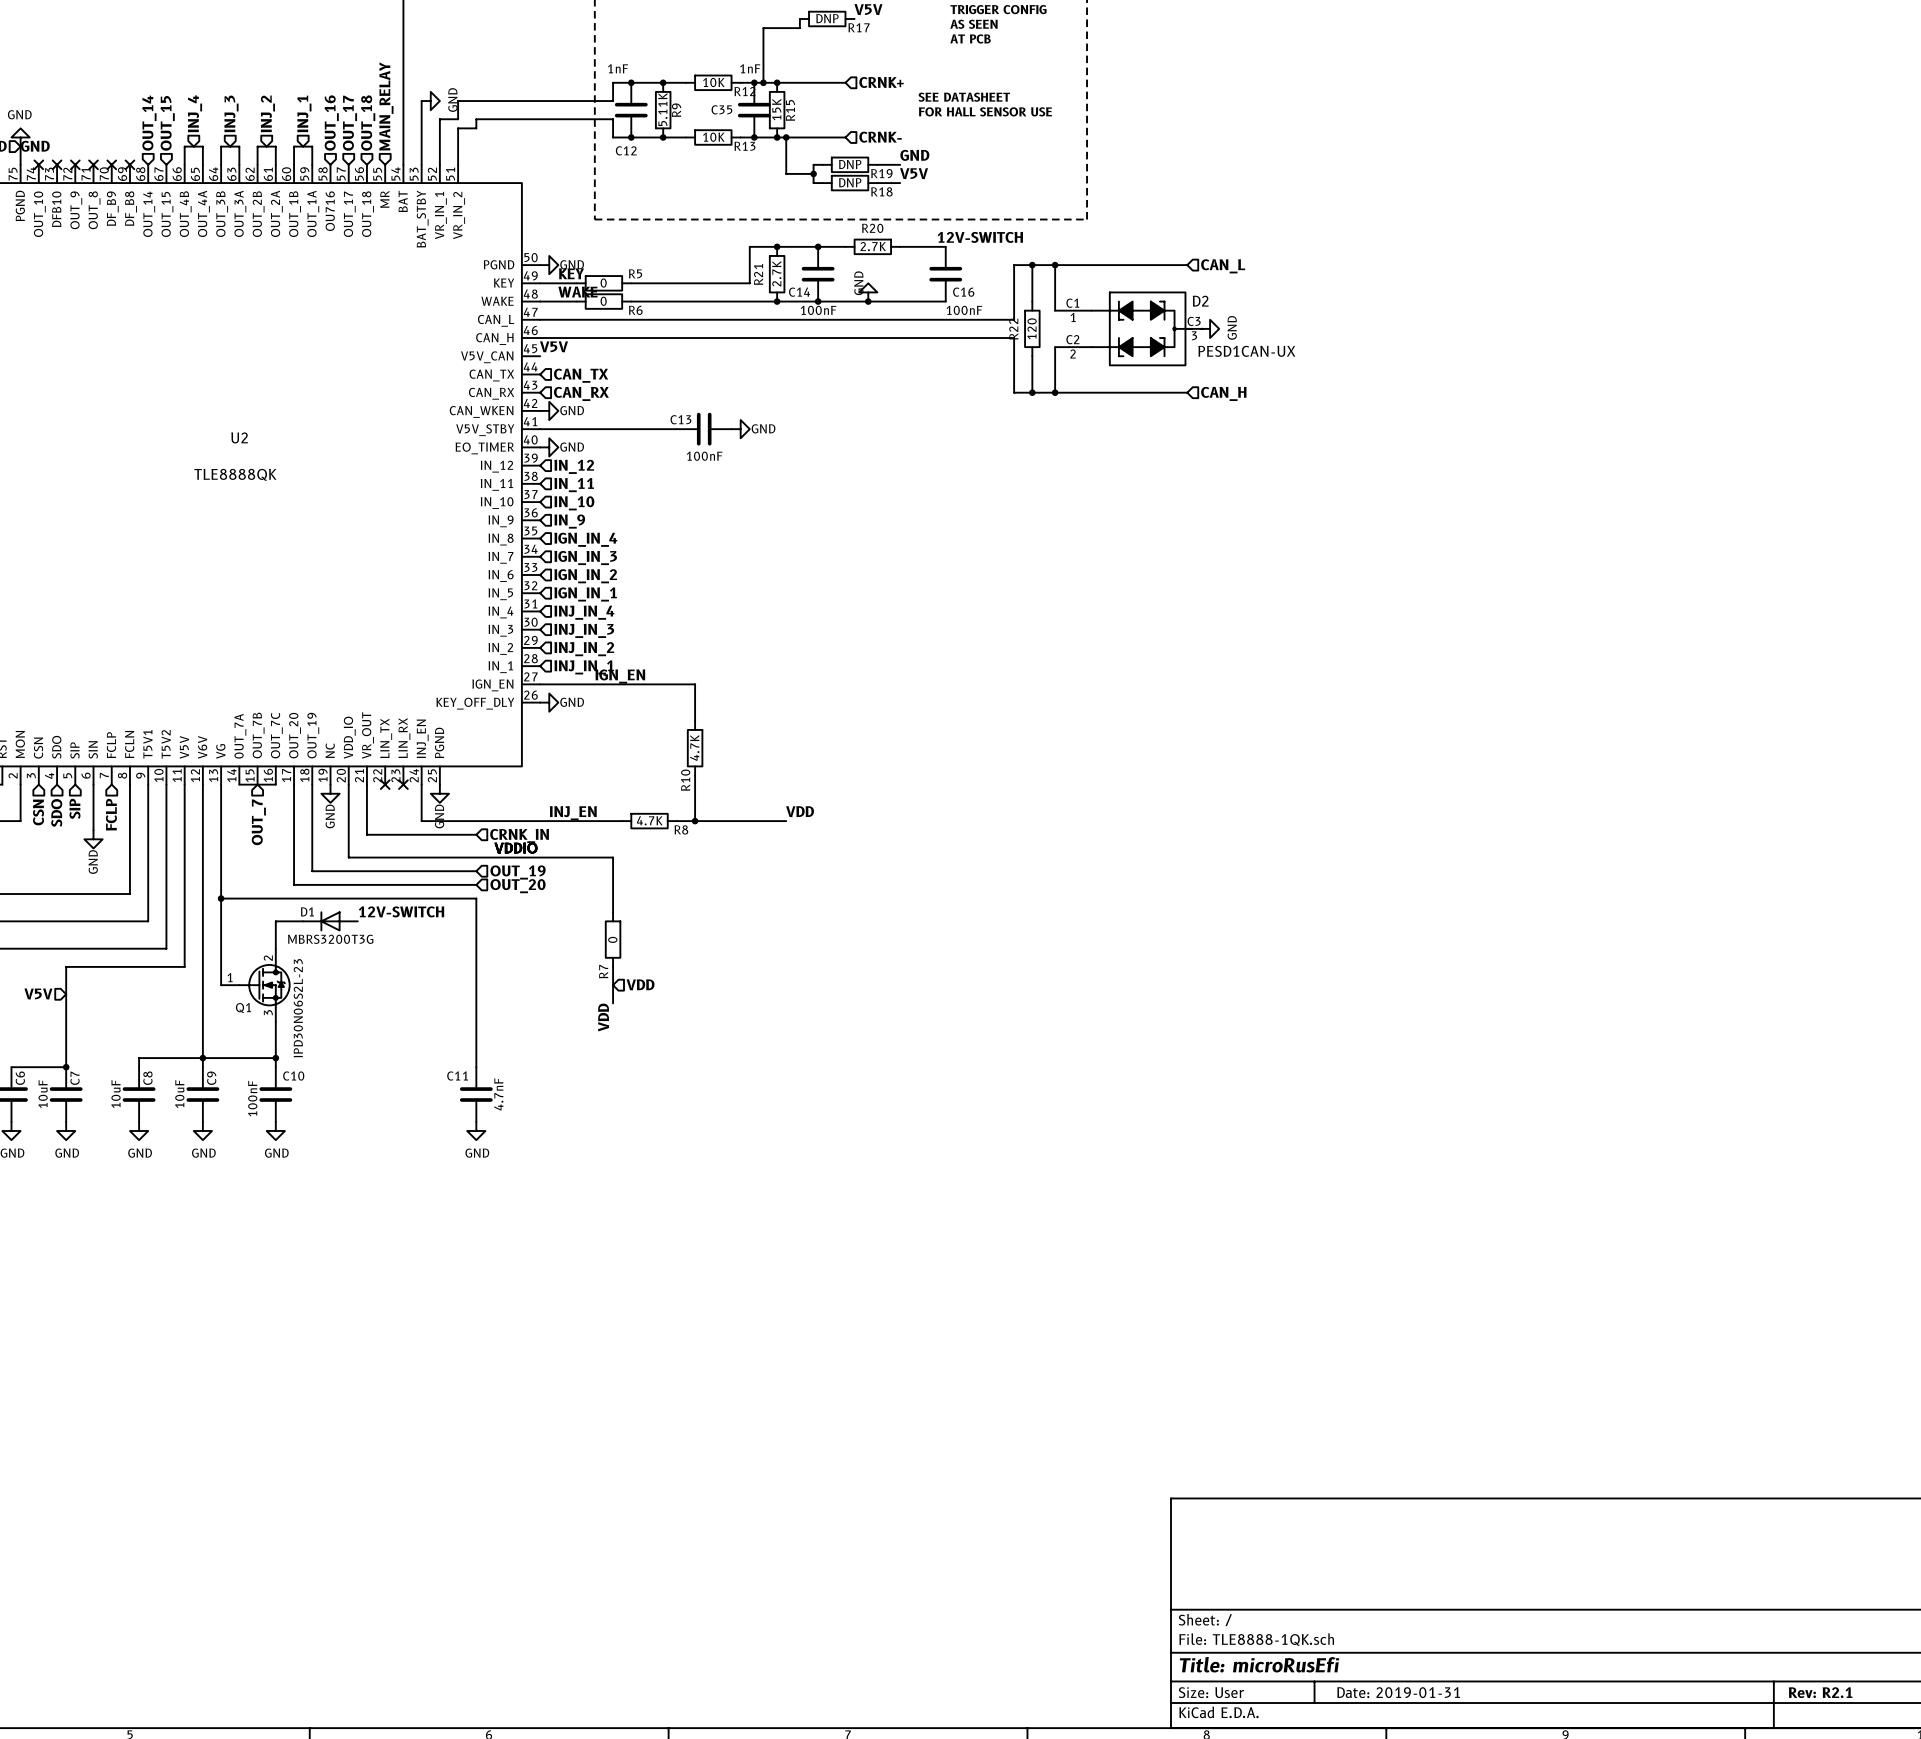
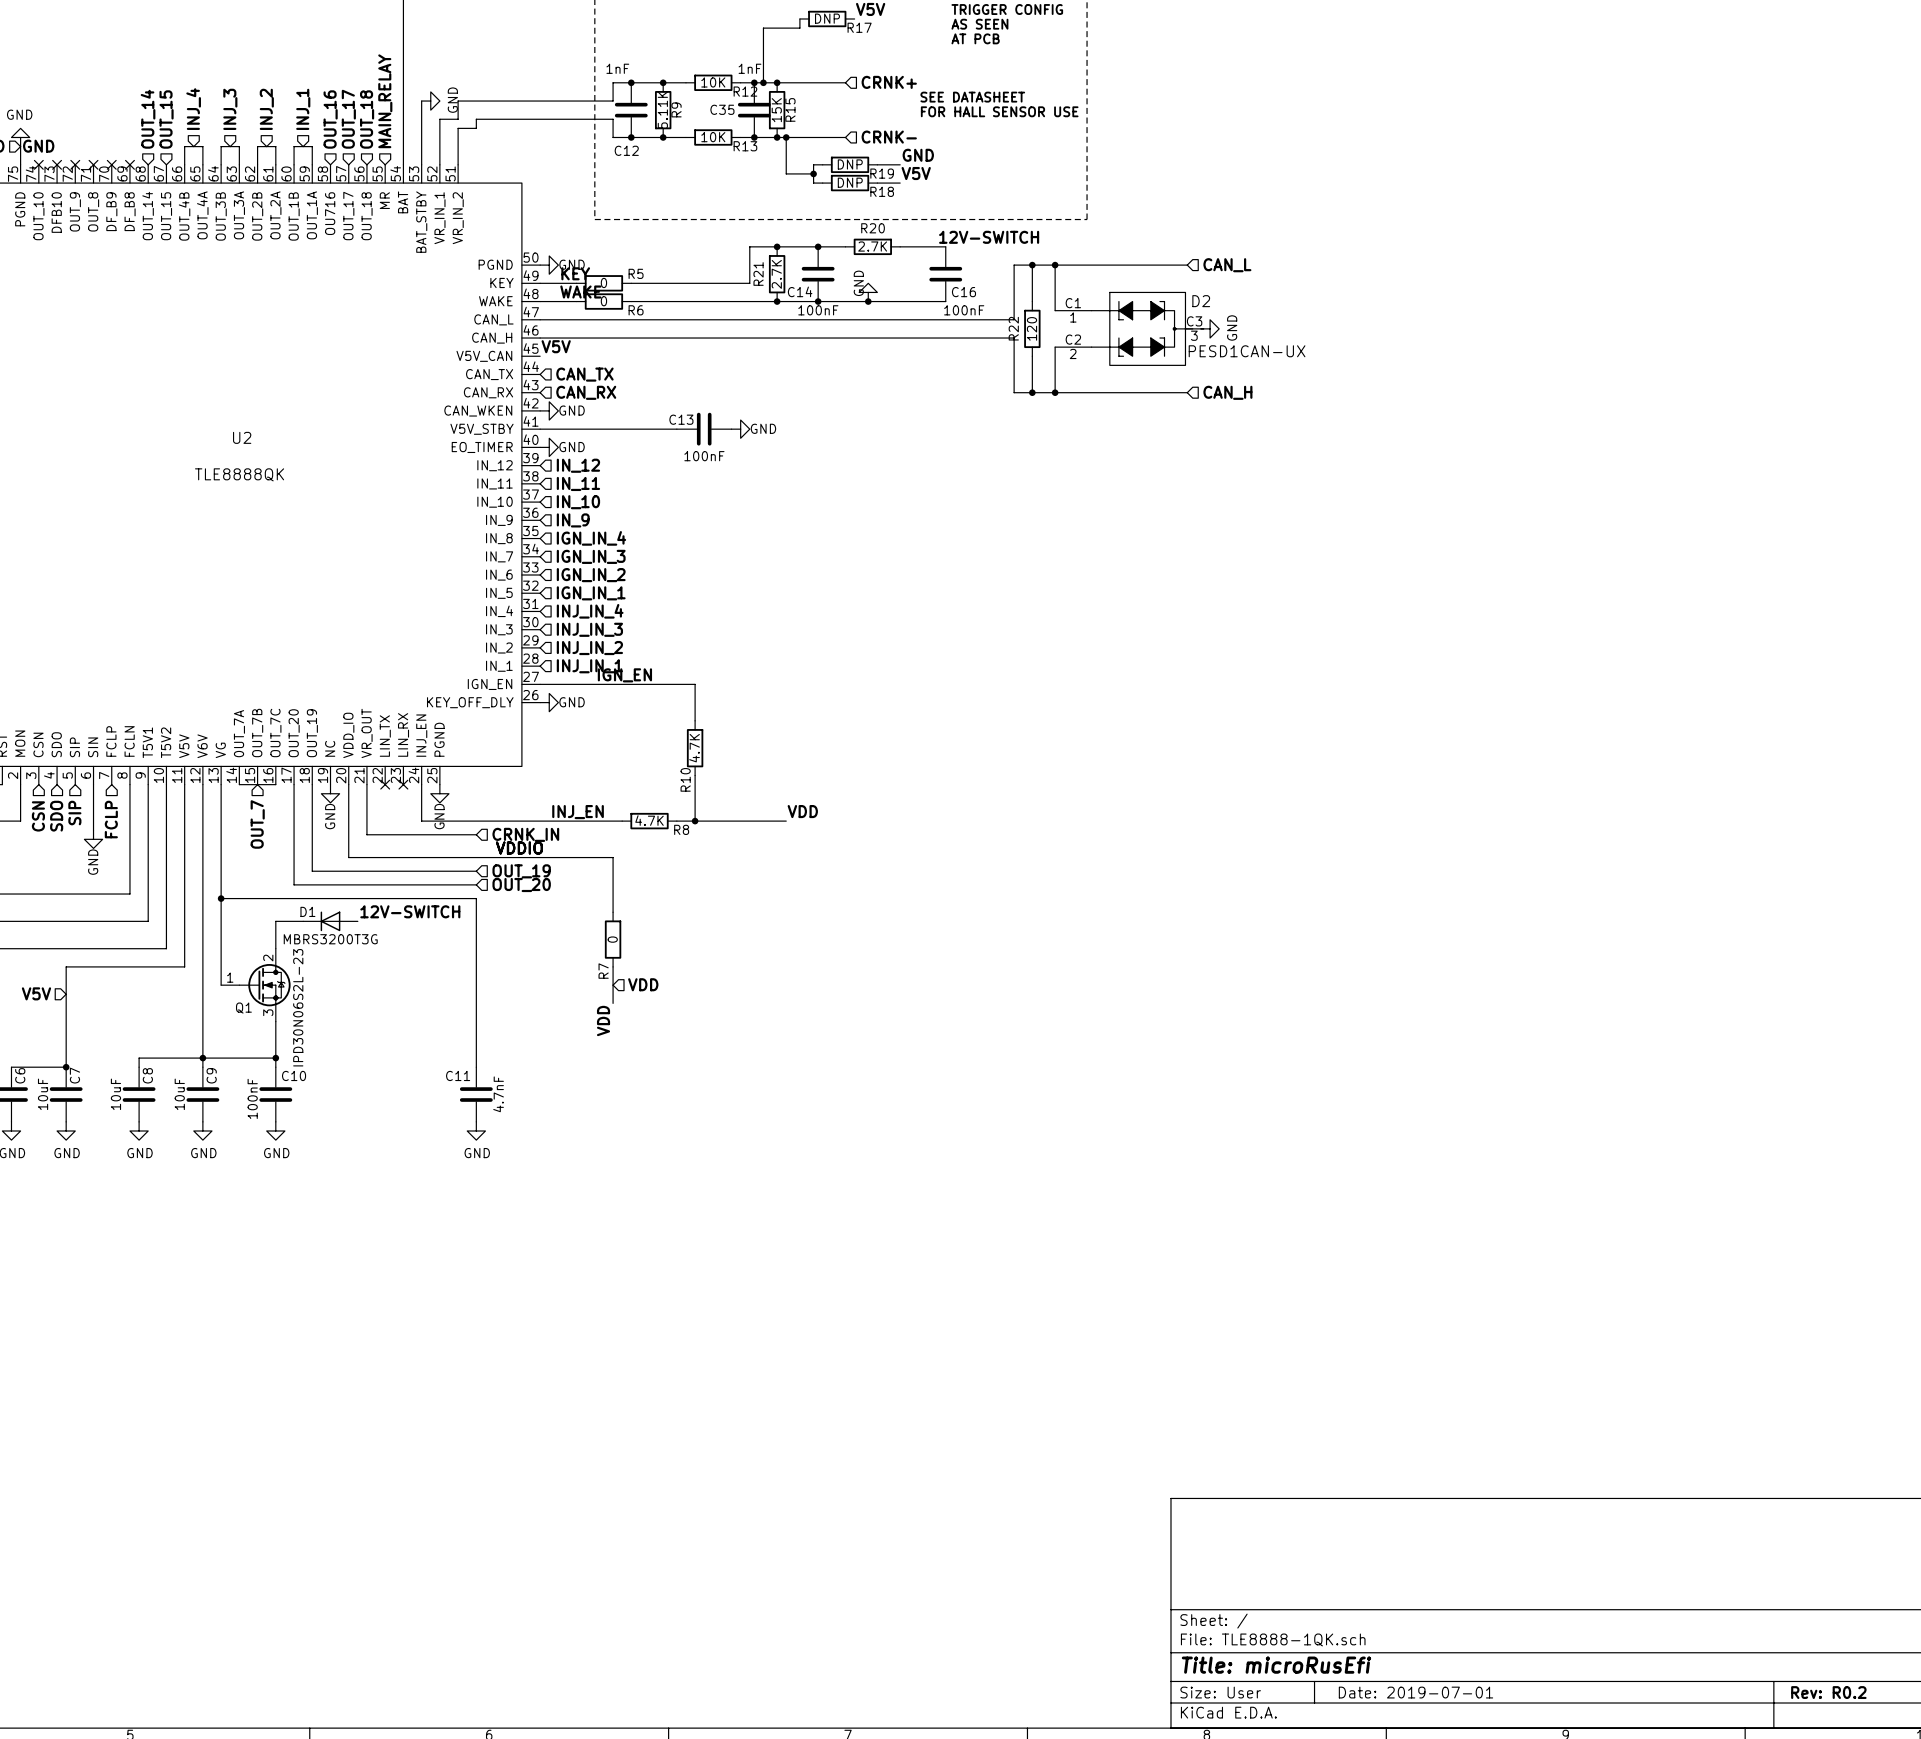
title block: Date: 2019-01-31 (1398, 1692) -> Date: 2019-07-01 (1415, 1692)
title block: Rev: R2.1 (1820, 1692) -> Rev: R0.2 (1828, 1692)

